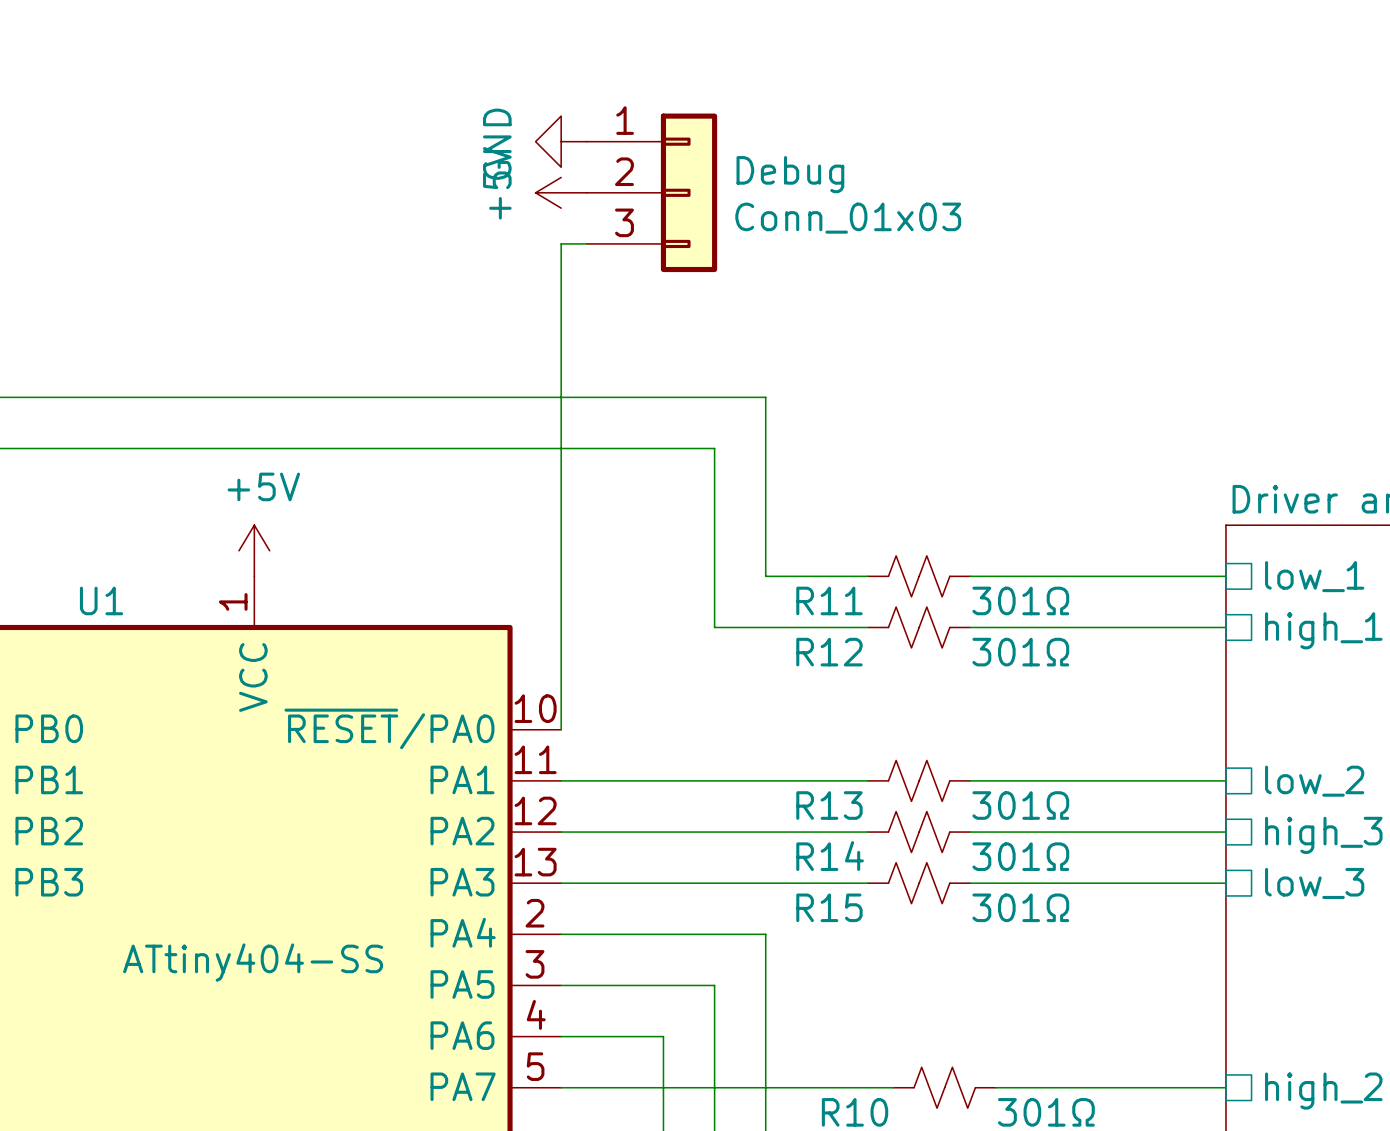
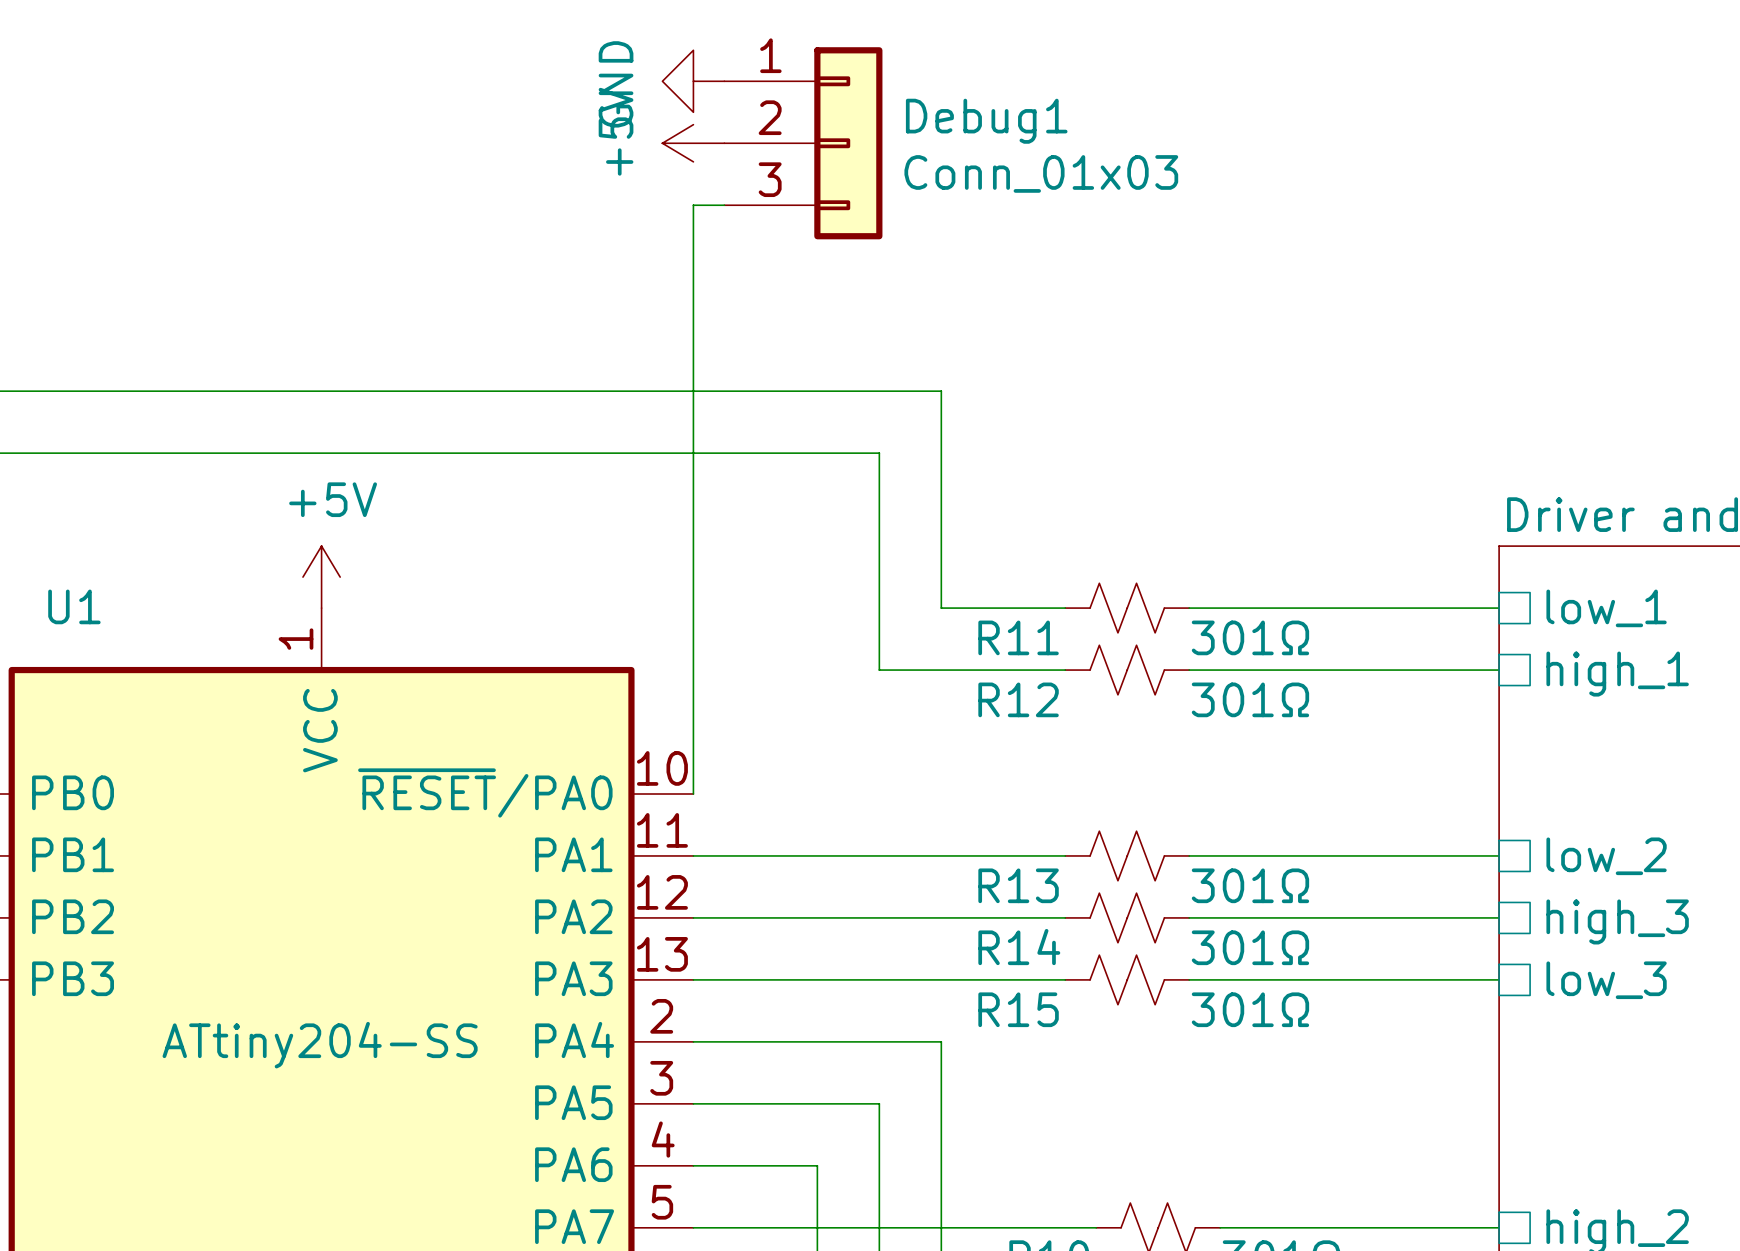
Debug name: Debug (790, 174) -> Debug1 (986, 121)
U1 name position: U1 (101, 600) -> U1 (74, 606)
U1 value: ATtiny404-SS (253, 962) -> ATtiny204-SS (320, 1045)

